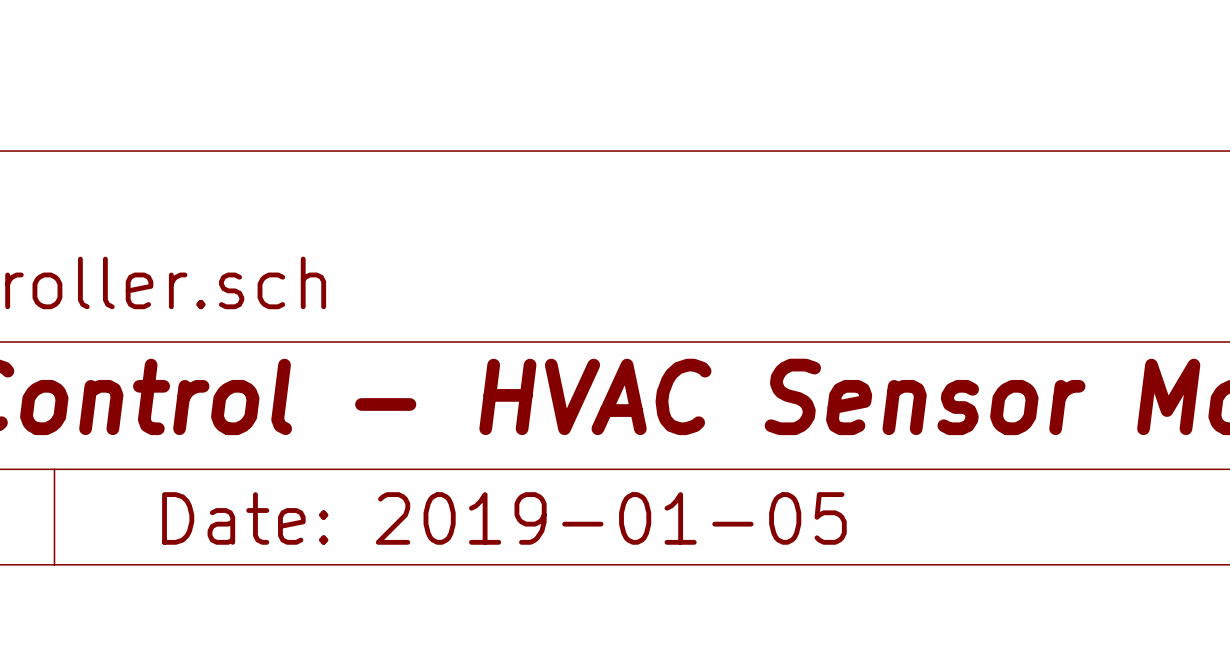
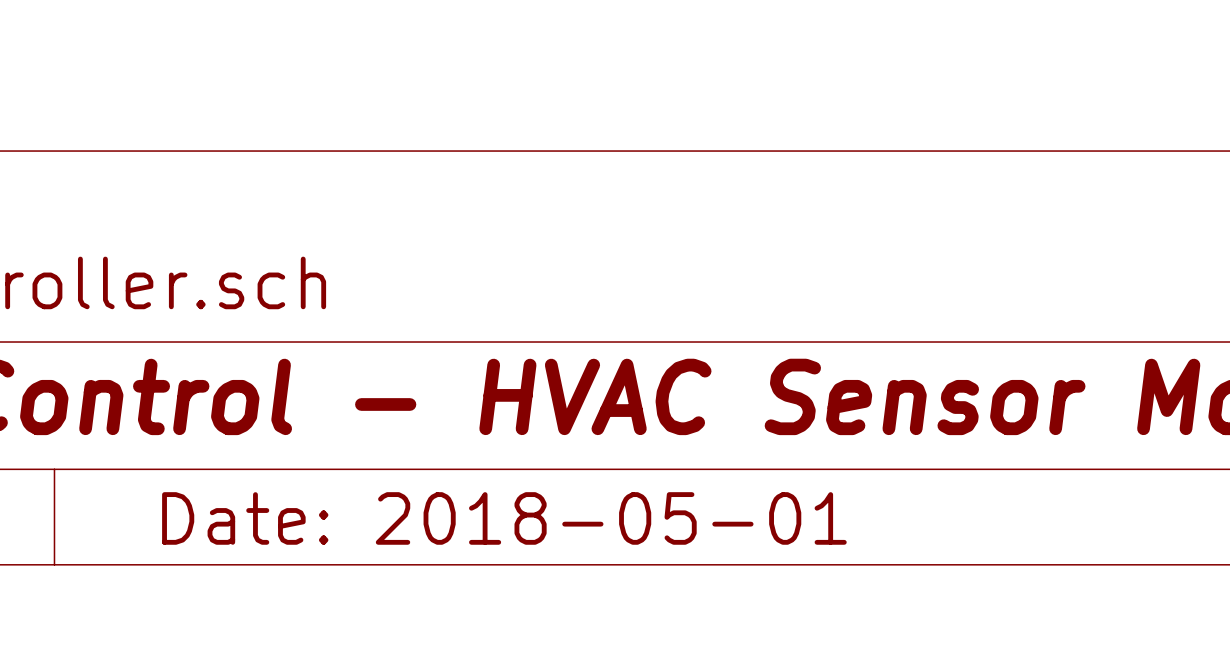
title block: Date: 2019-01-05 (504, 518) -> Date: 2018-05-01 (504, 518)

